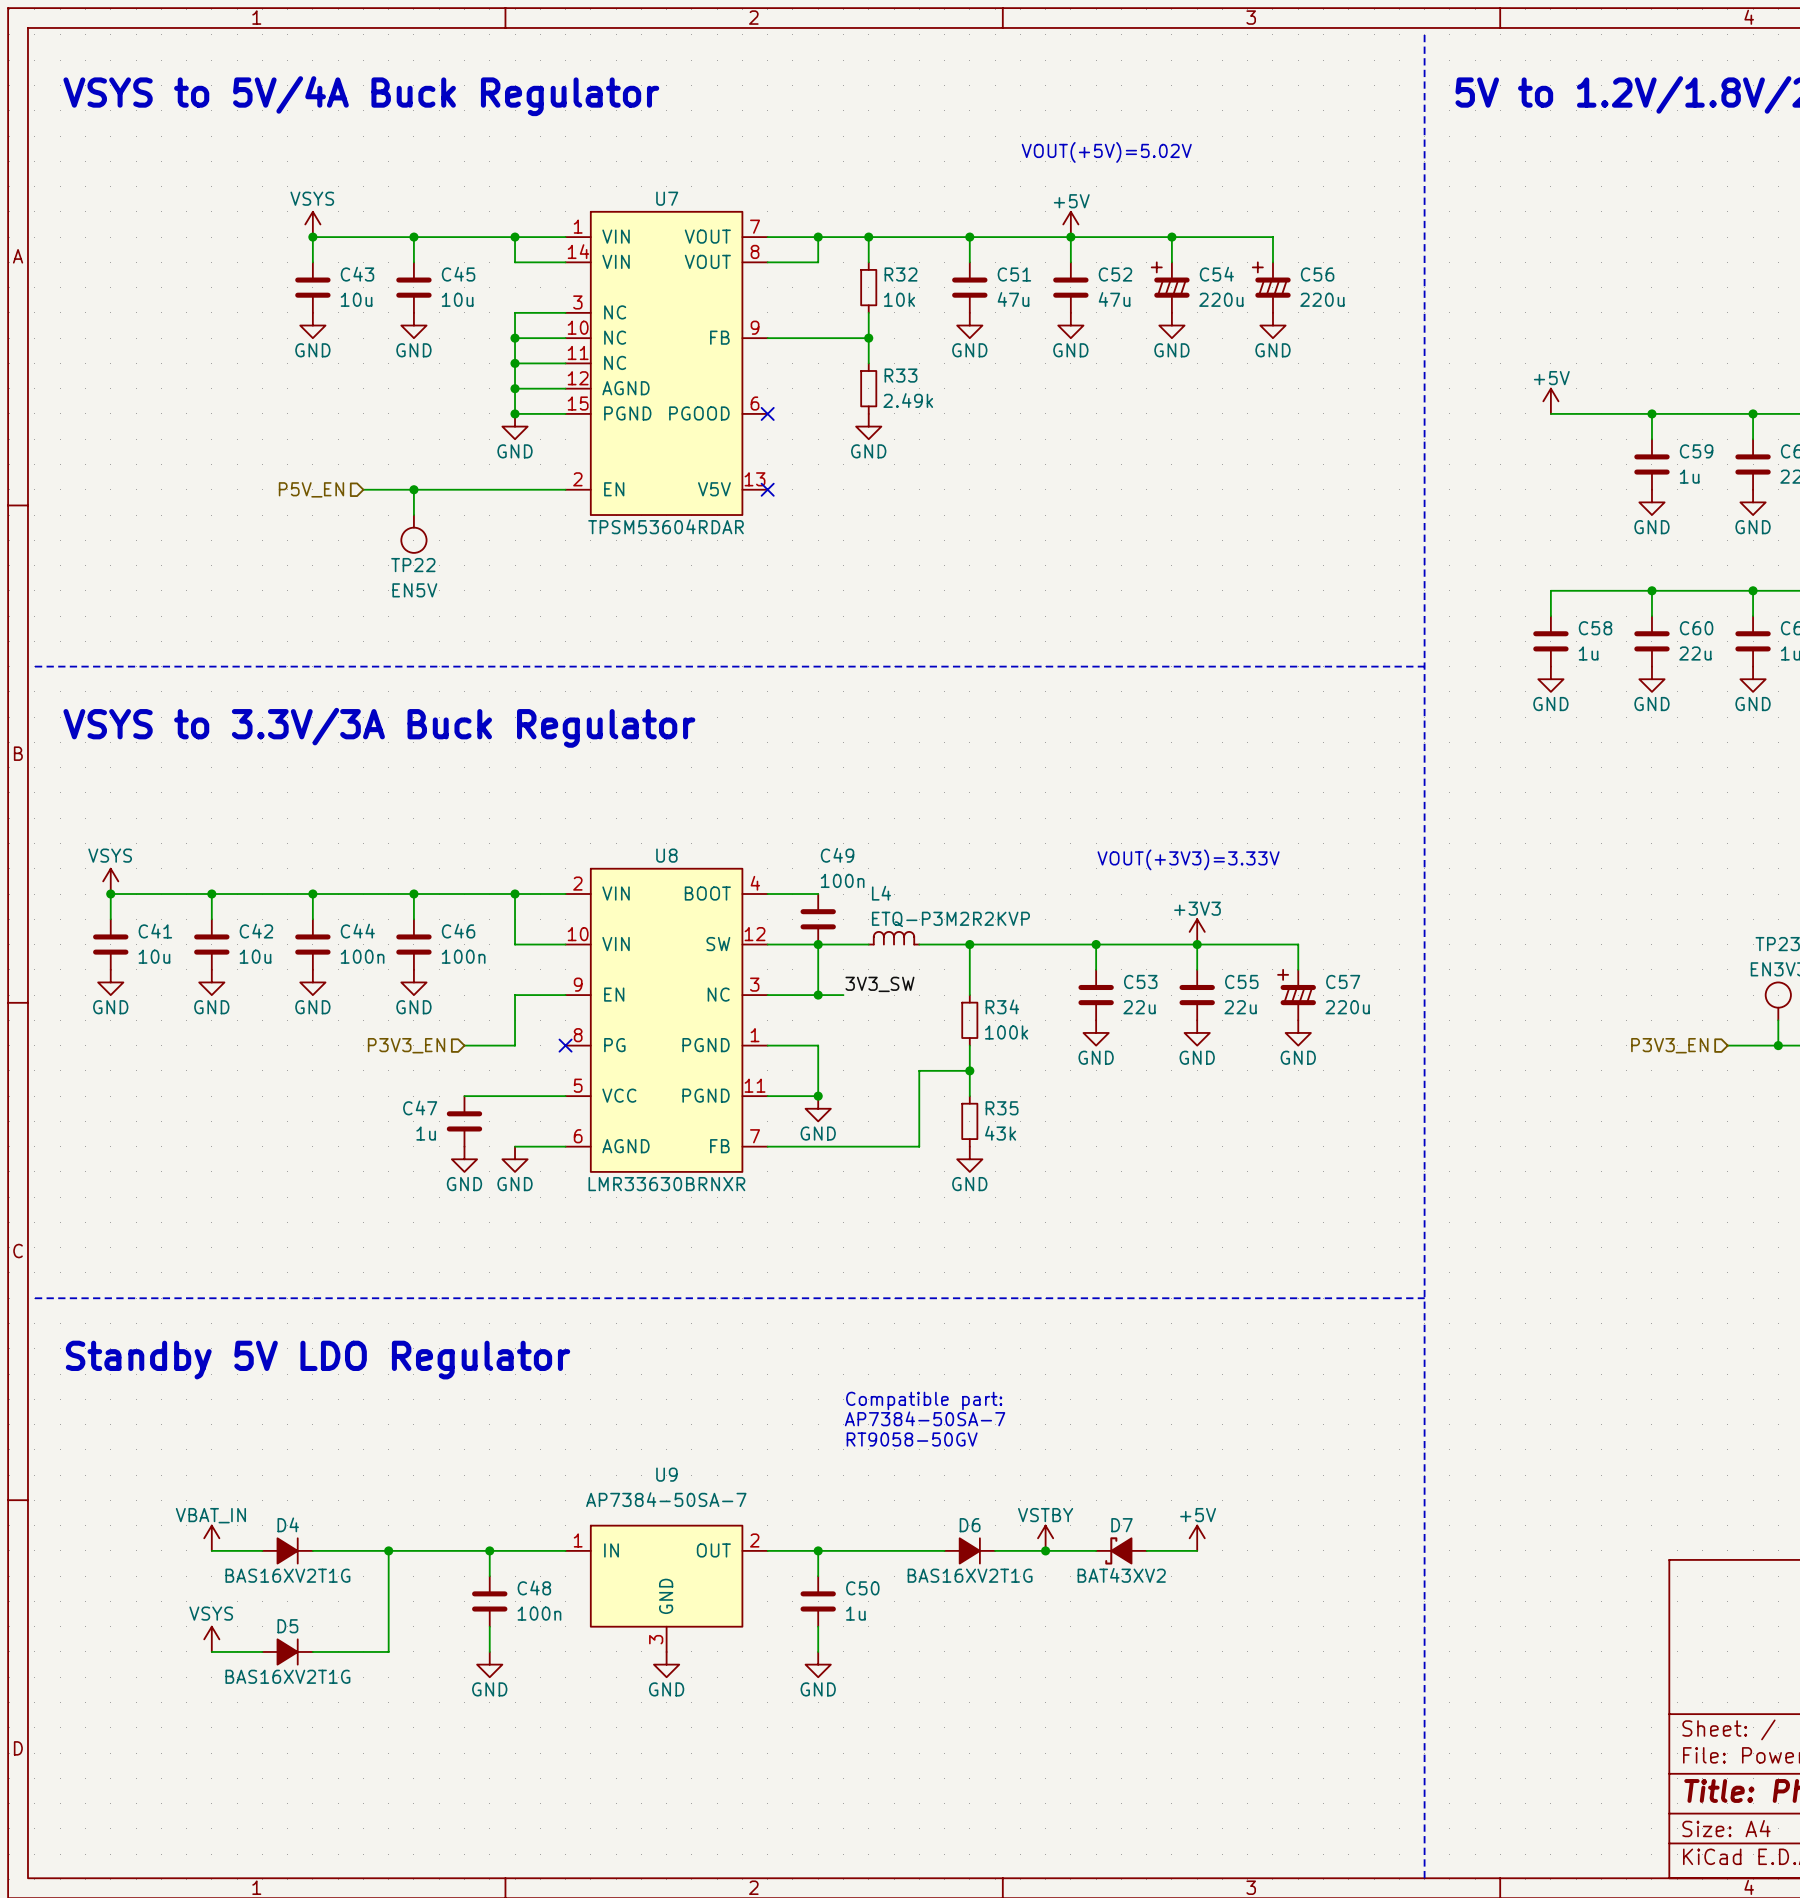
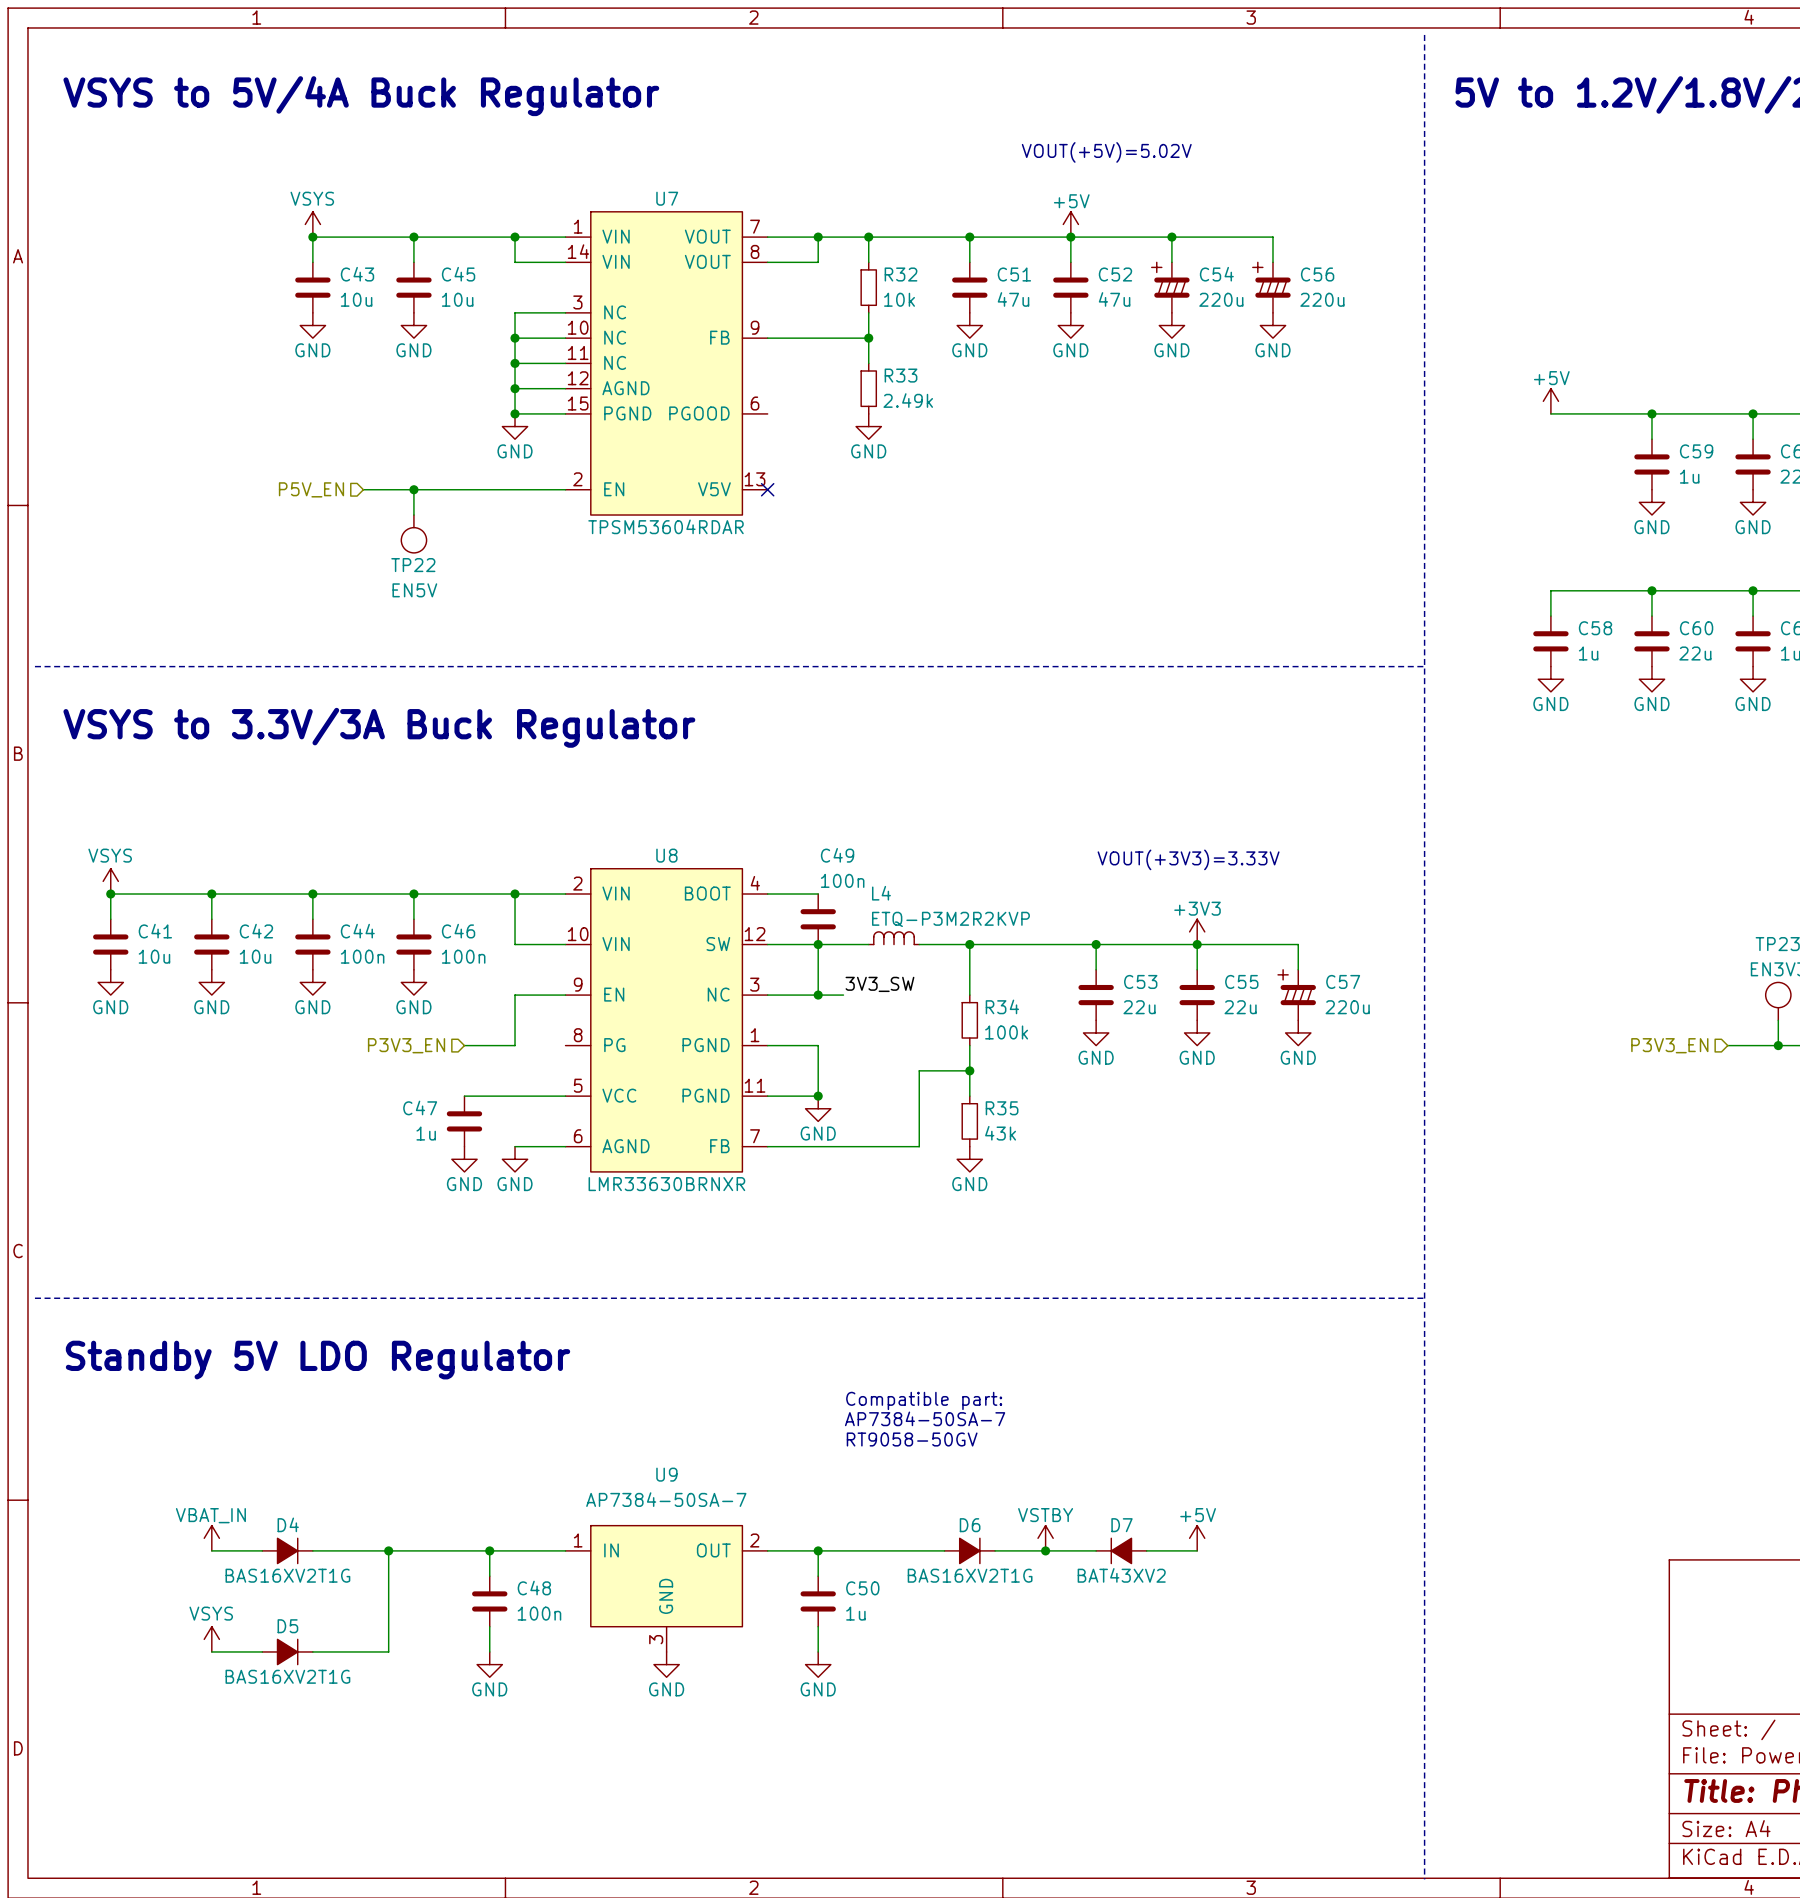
no-connect mark: (767, 413) -> none
no-connect mark: (565, 1045) -> none
D7 symbol: [1096, 1537, 1147, 1565] -> [1096, 1538, 1147, 1564]

